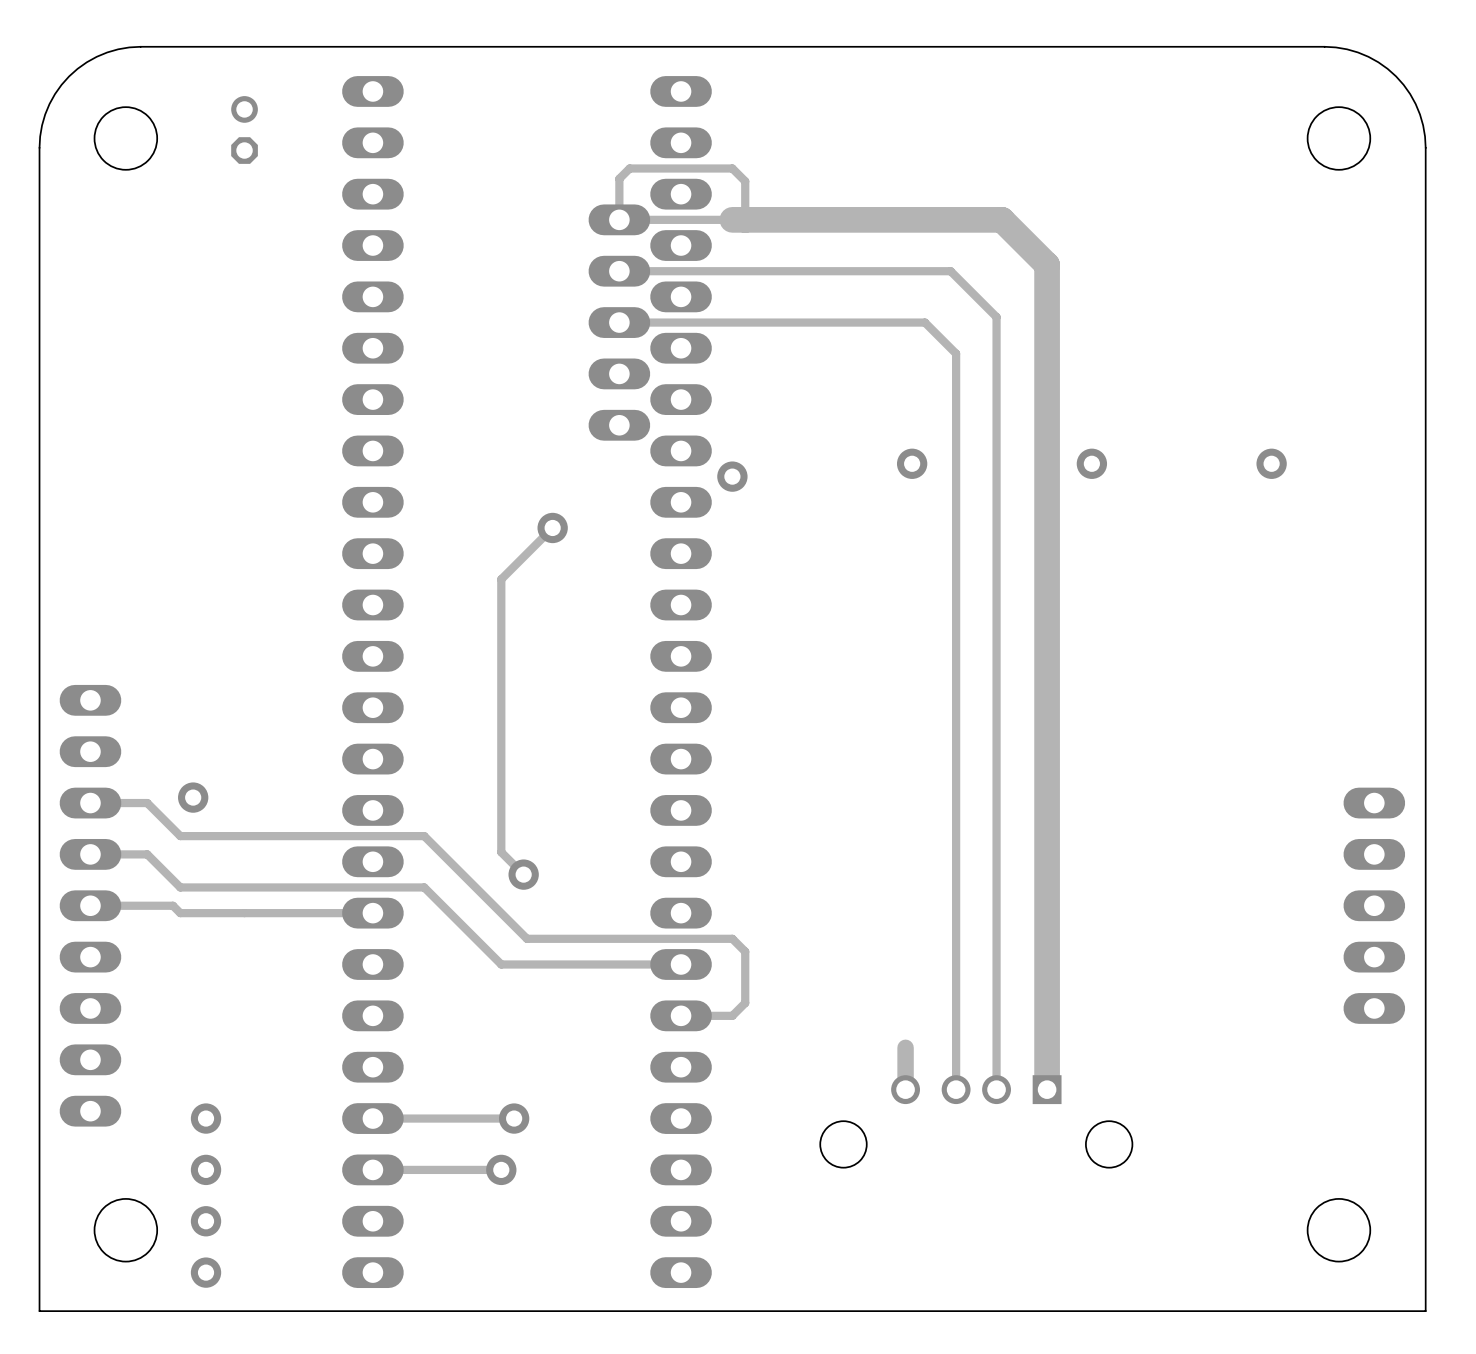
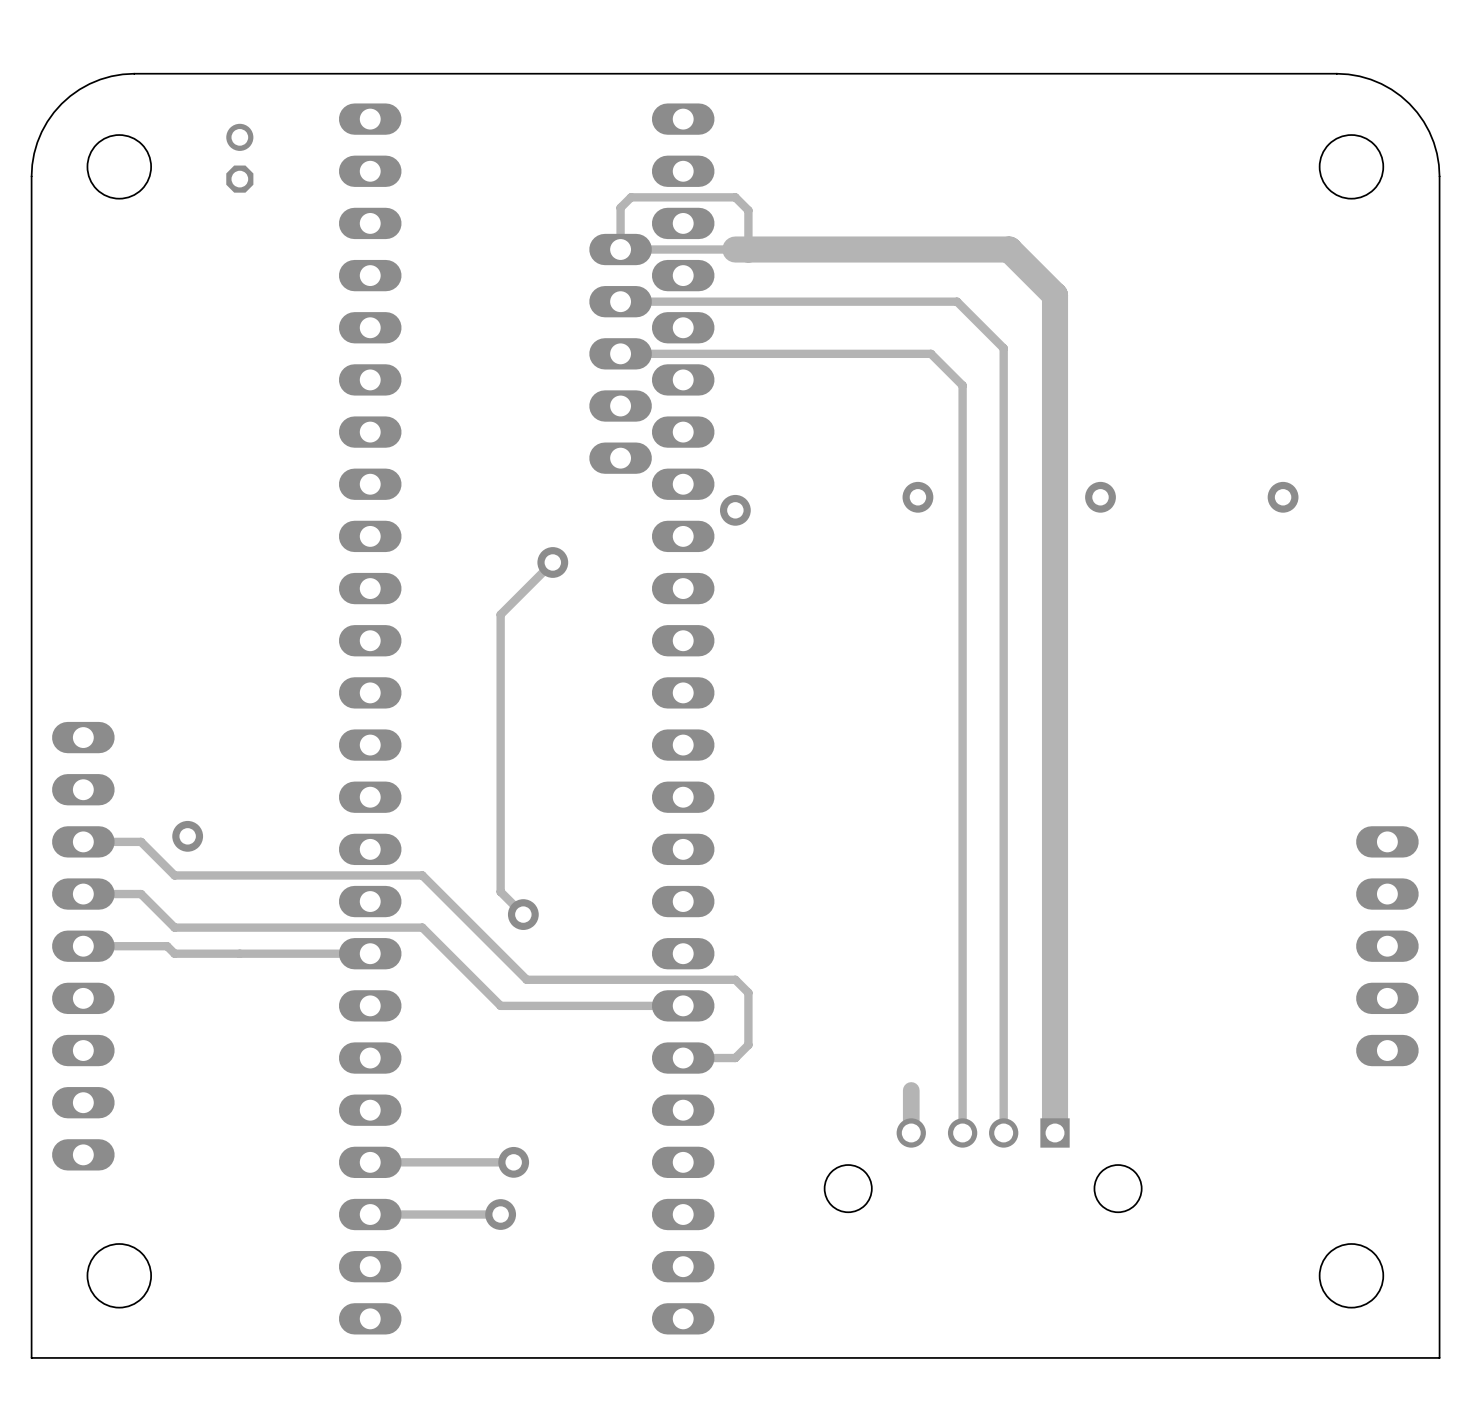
via: (206, 1118) -> none
via: (206, 1169) -> none
via: (206, 1221) -> none
via: (206, 1272) -> none

